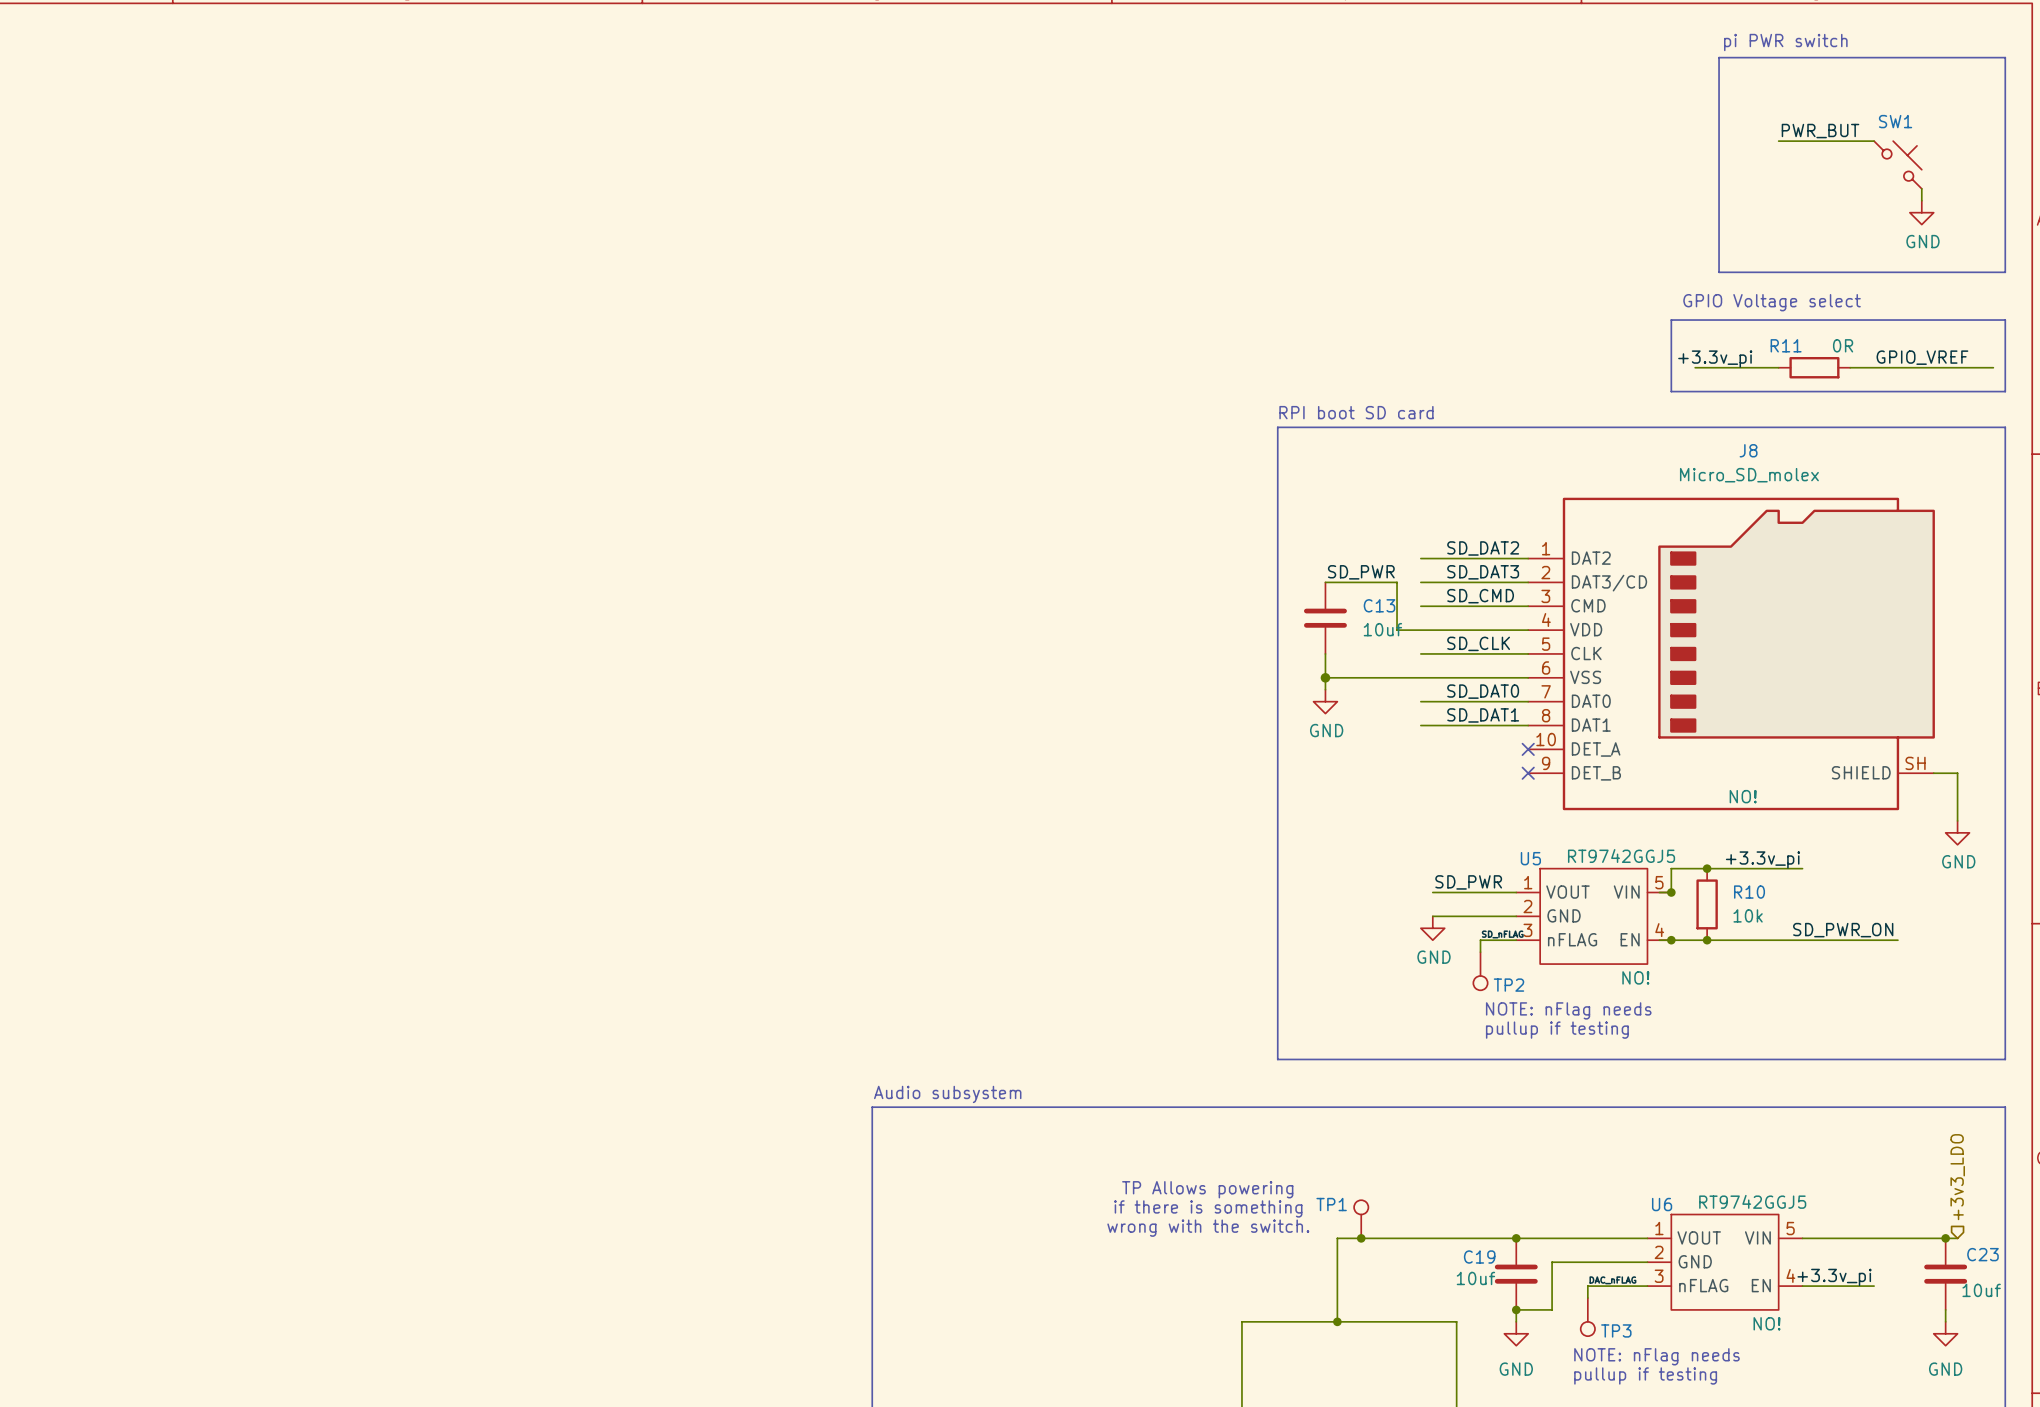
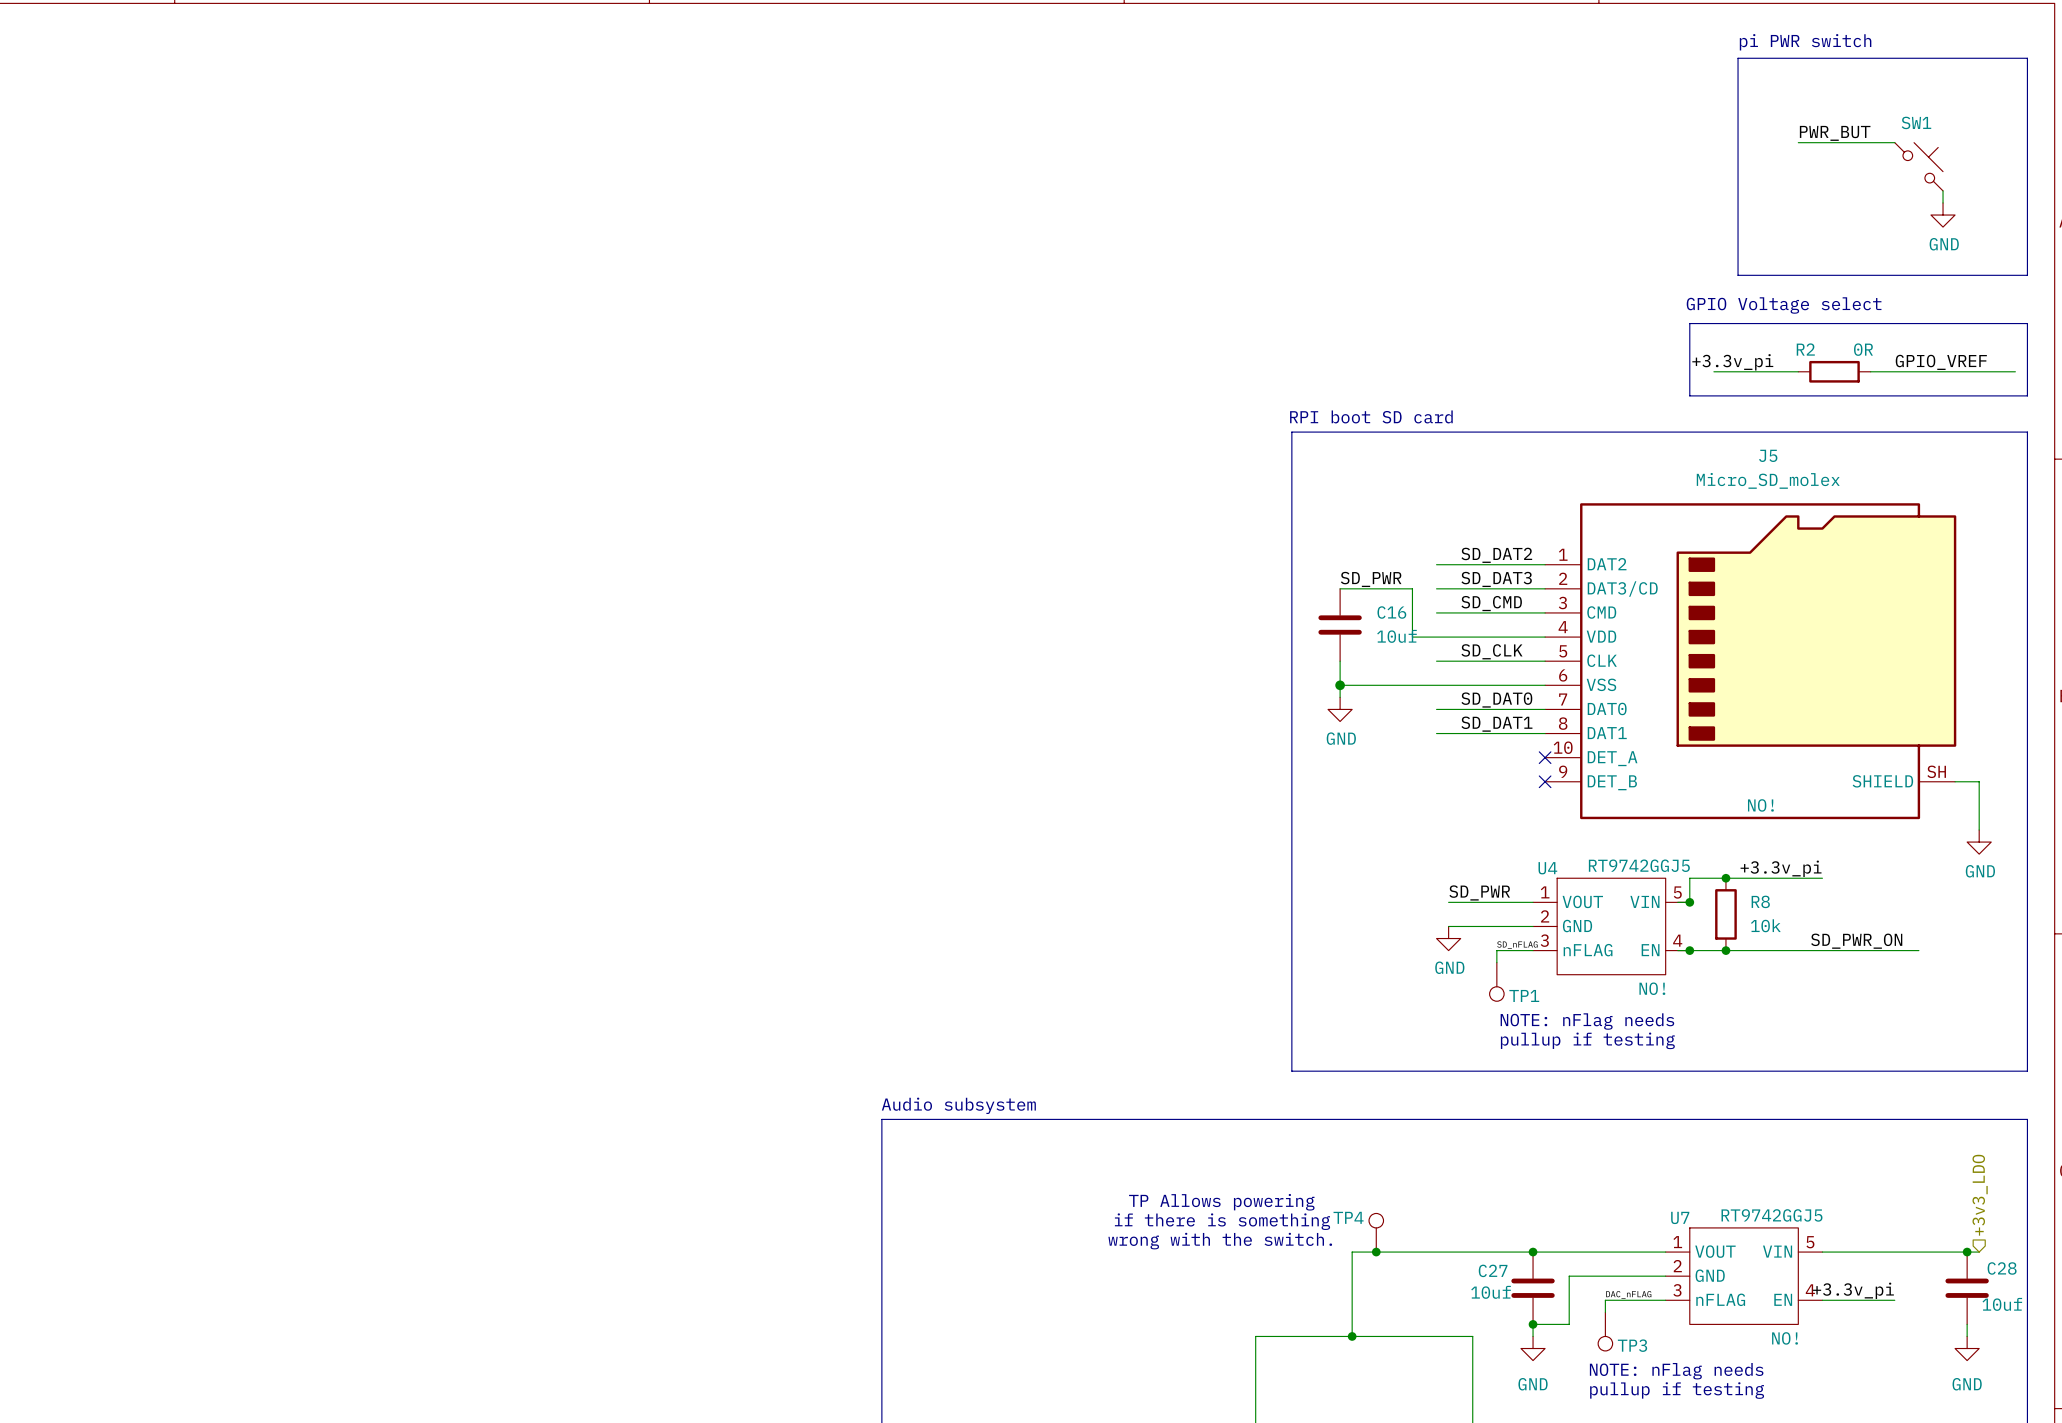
R11 name: R11 (1786, 345) -> R2 (1805, 349)
J8 name: J8 (1748, 450) -> J5 (1768, 455)
C13 name: C13 (1379, 605) -> C16 (1391, 612)
U5 name: U5 (1530, 858) -> U4 (1547, 868)
R10 name: R10 (1749, 892) -> R8 (1760, 901)
TP2 name: TP2 (1508, 985) -> TP1 (1524, 995)
TP1 name: TP1 (1331, 1204) -> TP4 (1348, 1217)
U6 name: U6 (1662, 1204) -> U7 (1680, 1217)
C23 name: C23 (1982, 1254) -> C28 (2002, 1268)
C19 name: C19 (1479, 1257) -> C27 (1493, 1270)

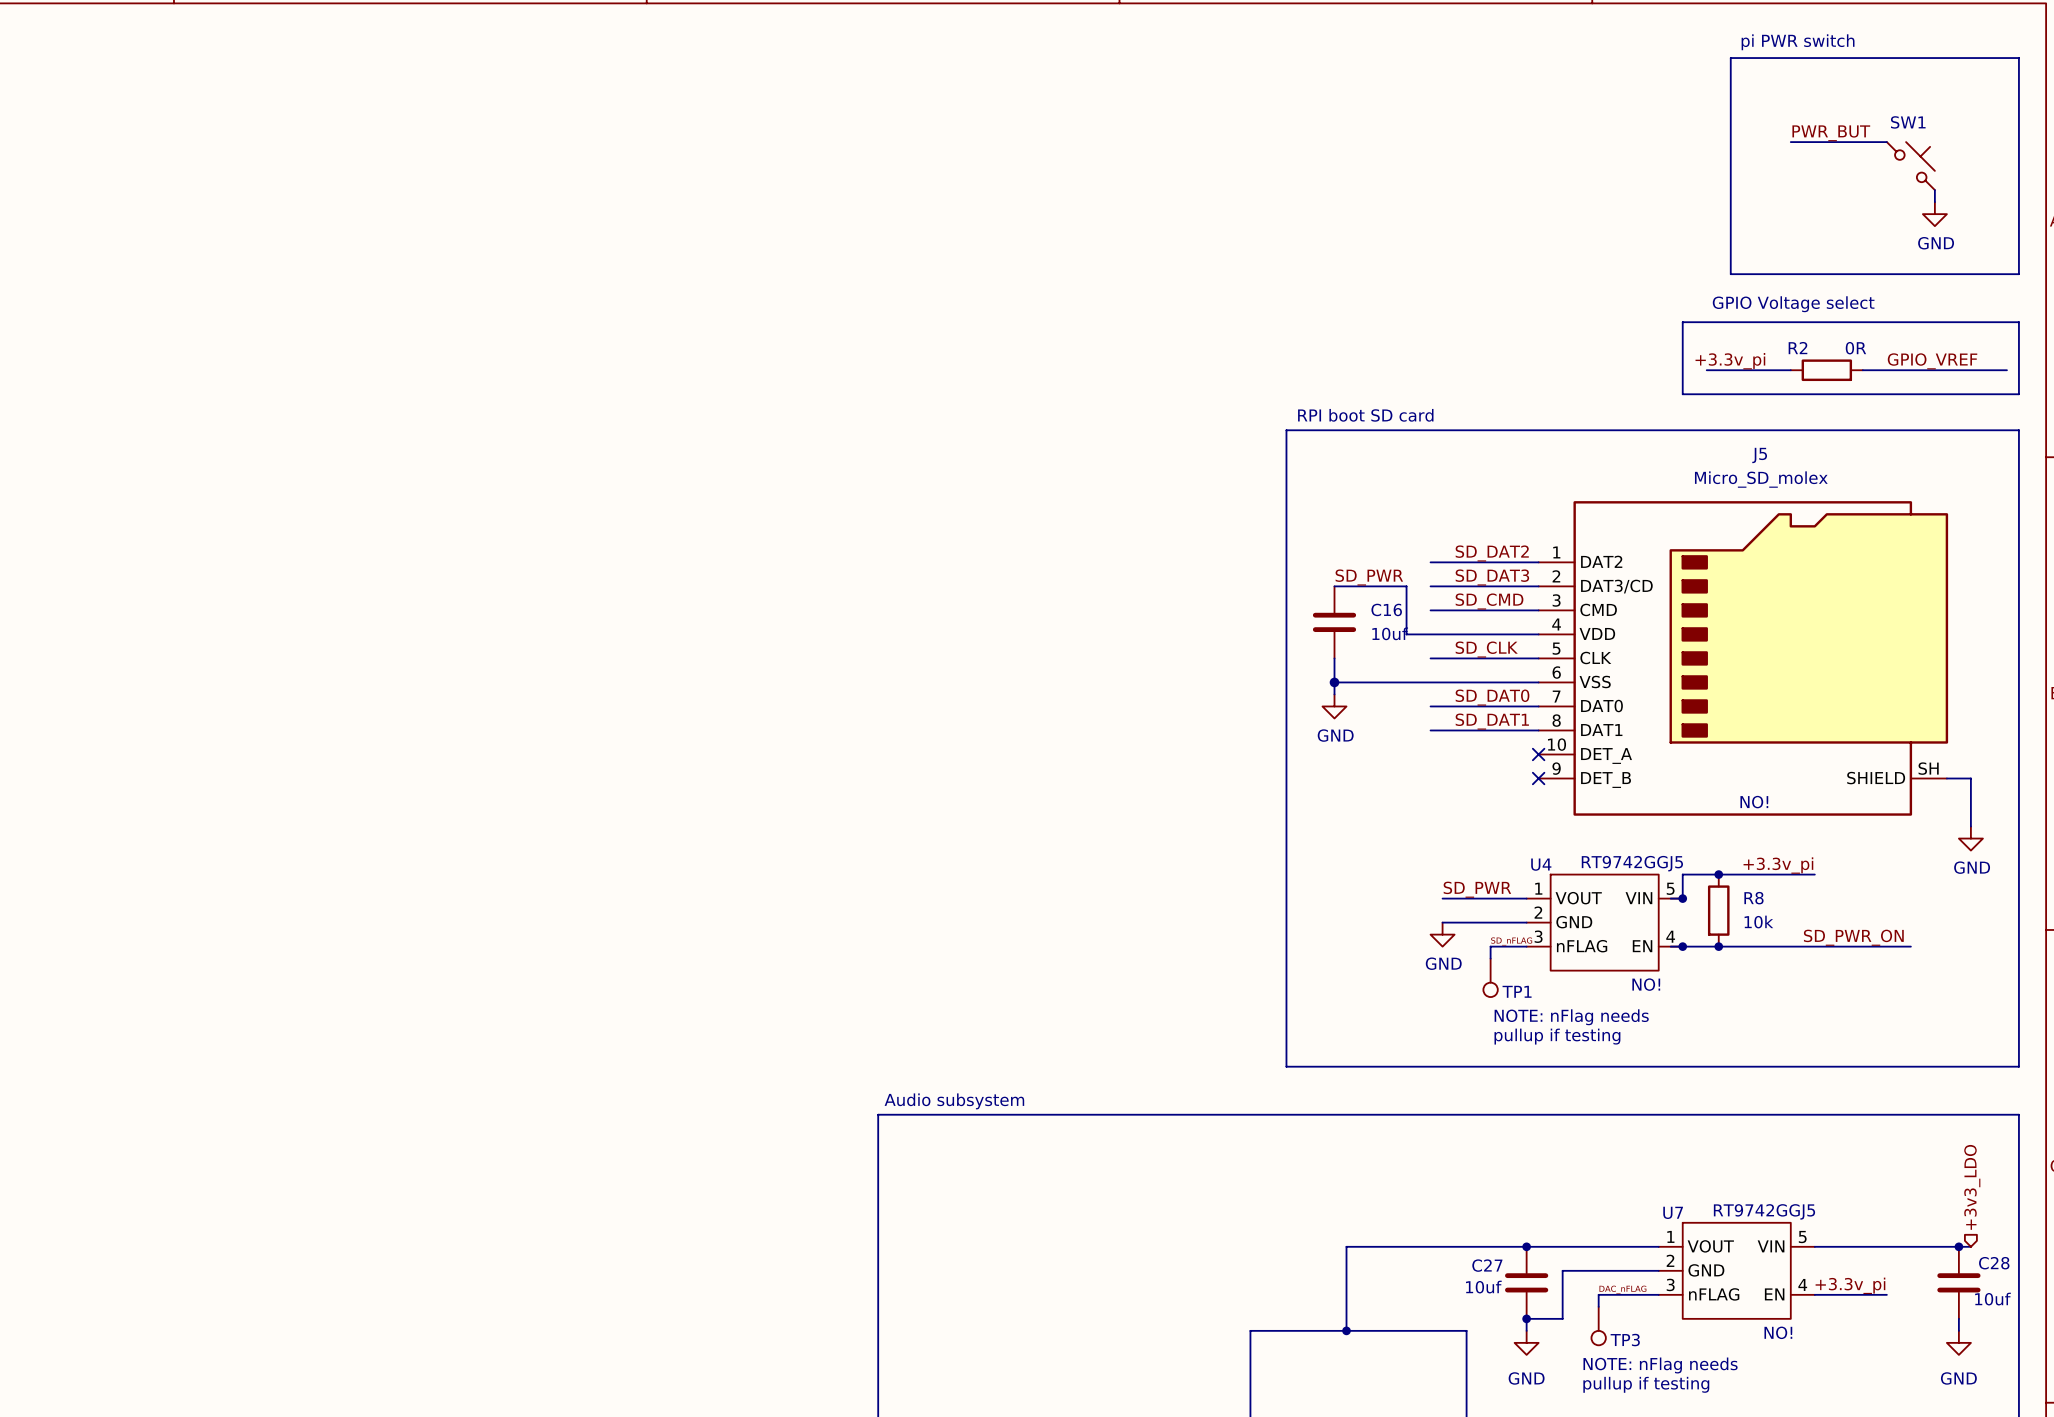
text: TP Allows powering (1221, 1202) -> none
text: if there is something (1222, 1221) -> none
TP4: (1376, 1232) -> none
text: wrong with the switch. (1220, 1241) -> none
junction: (1376, 1252) -> none

